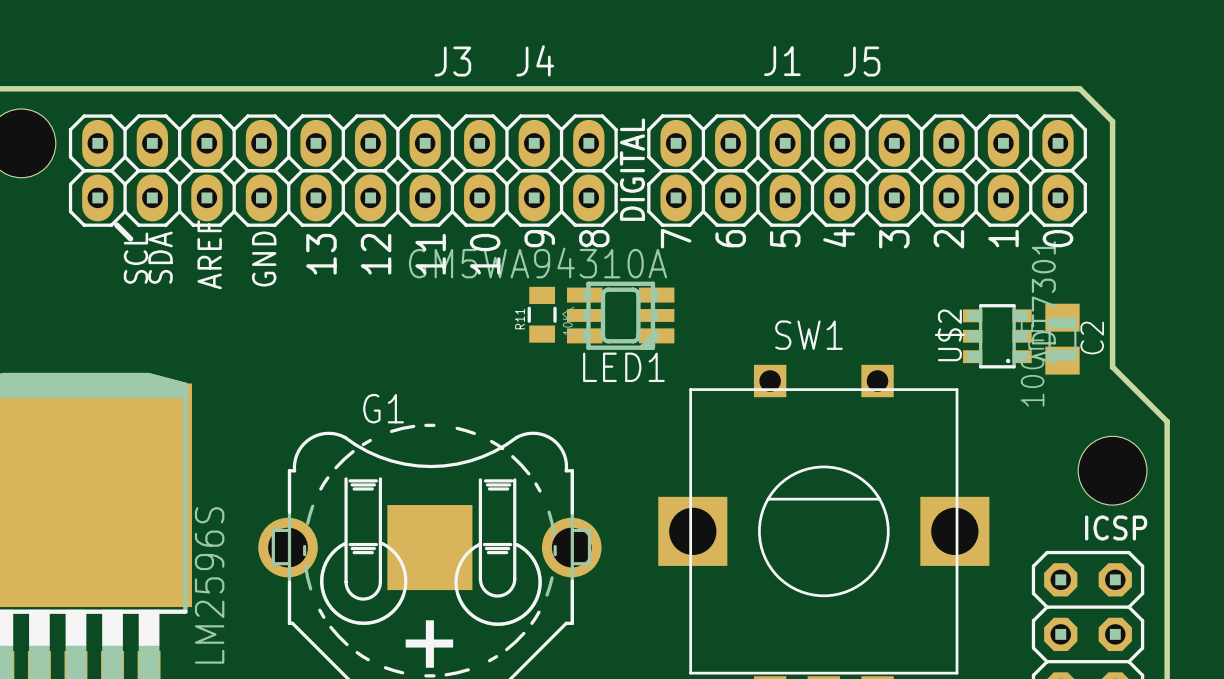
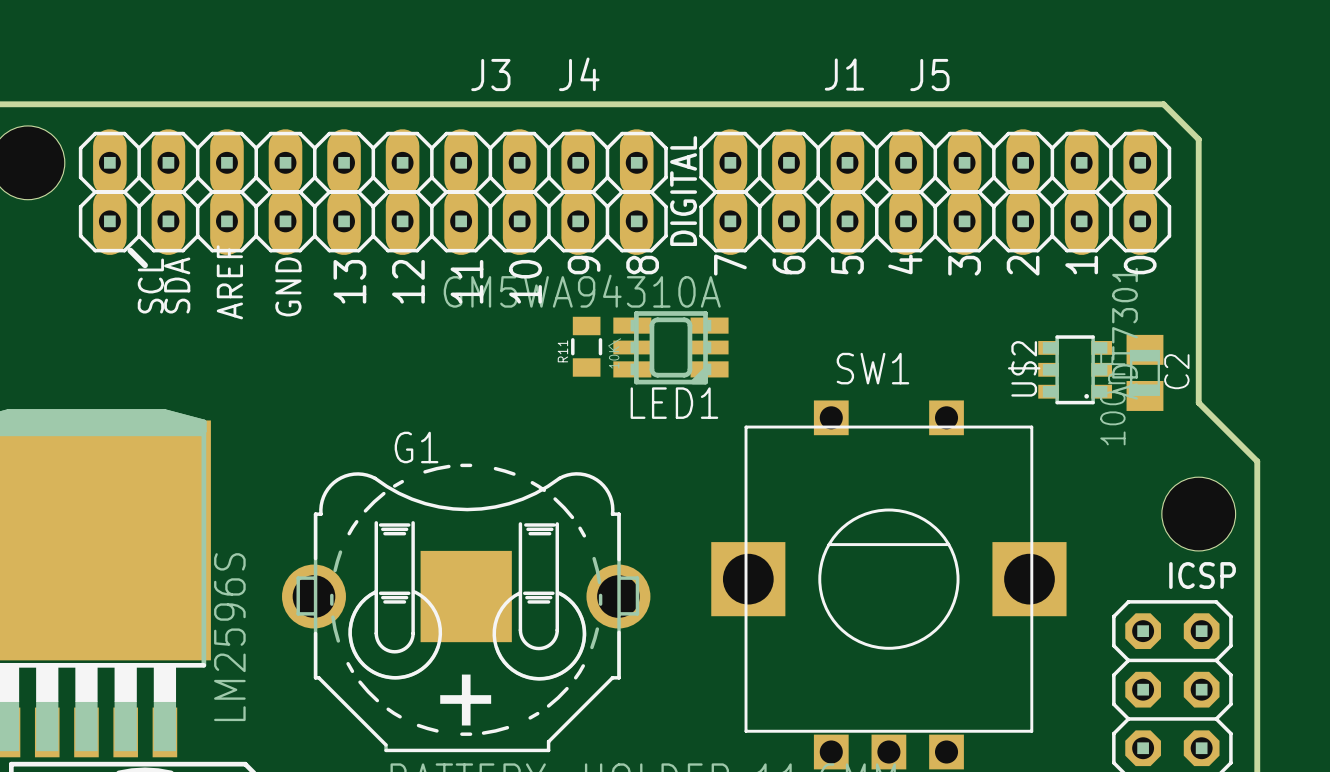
J3 footprint: [68, 114, 618, 173] -> [78, 129, 668, 197]
J1 footprint: [647, 114, 1087, 173] -> [699, 129, 1172, 197]
J4 footprint: [68, 169, 618, 227] -> [78, 187, 668, 255]
J5 footprint: [647, 169, 1087, 227] -> [699, 187, 1172, 255]

